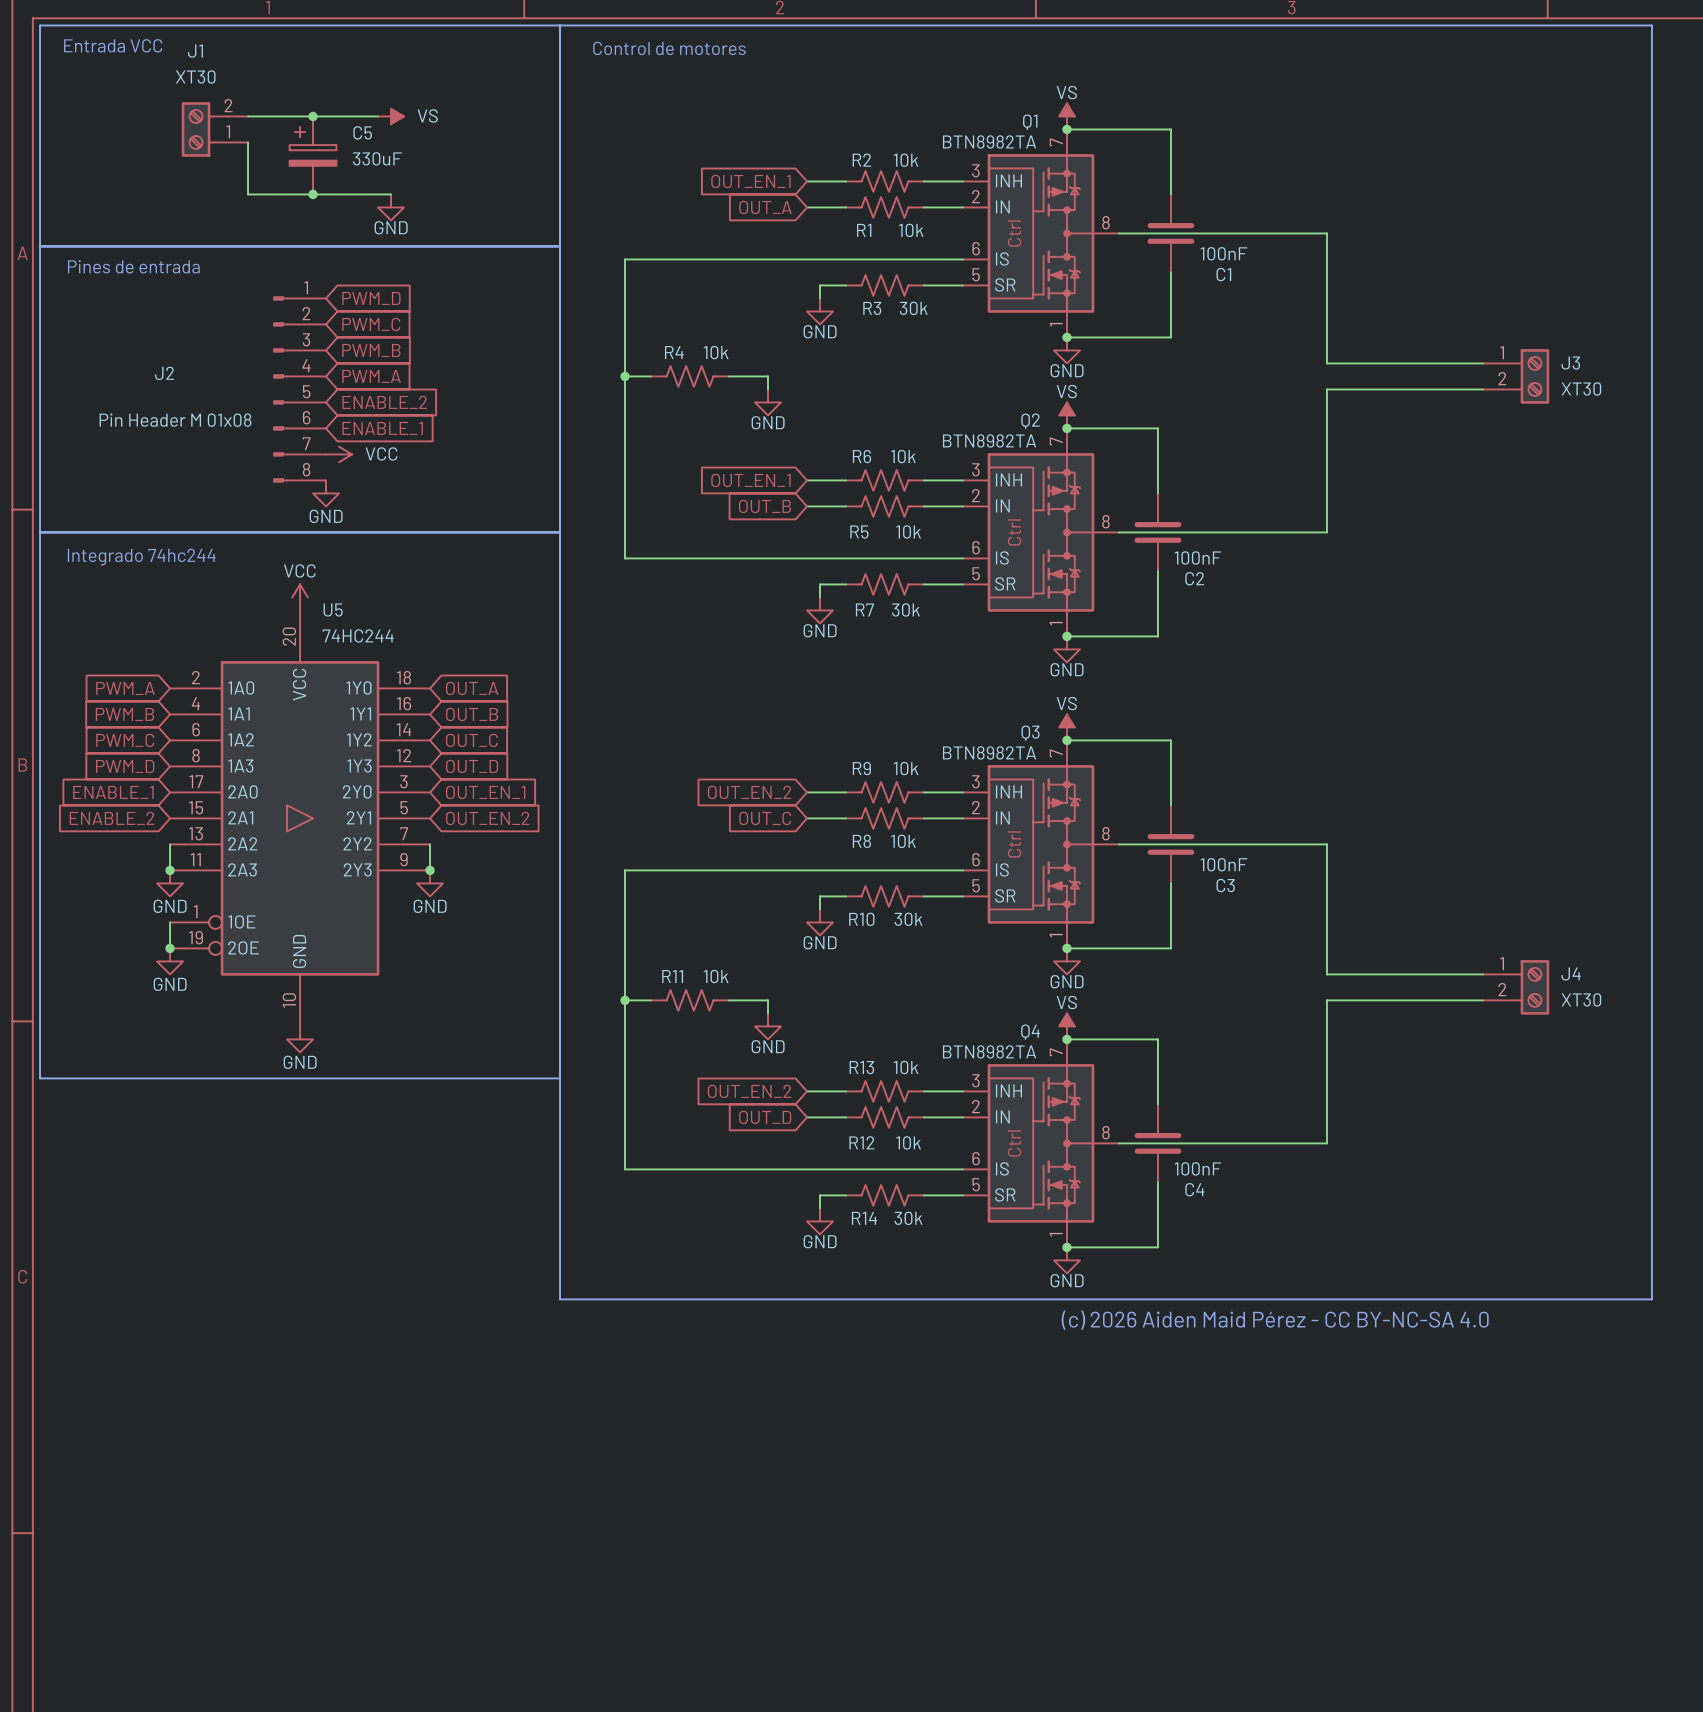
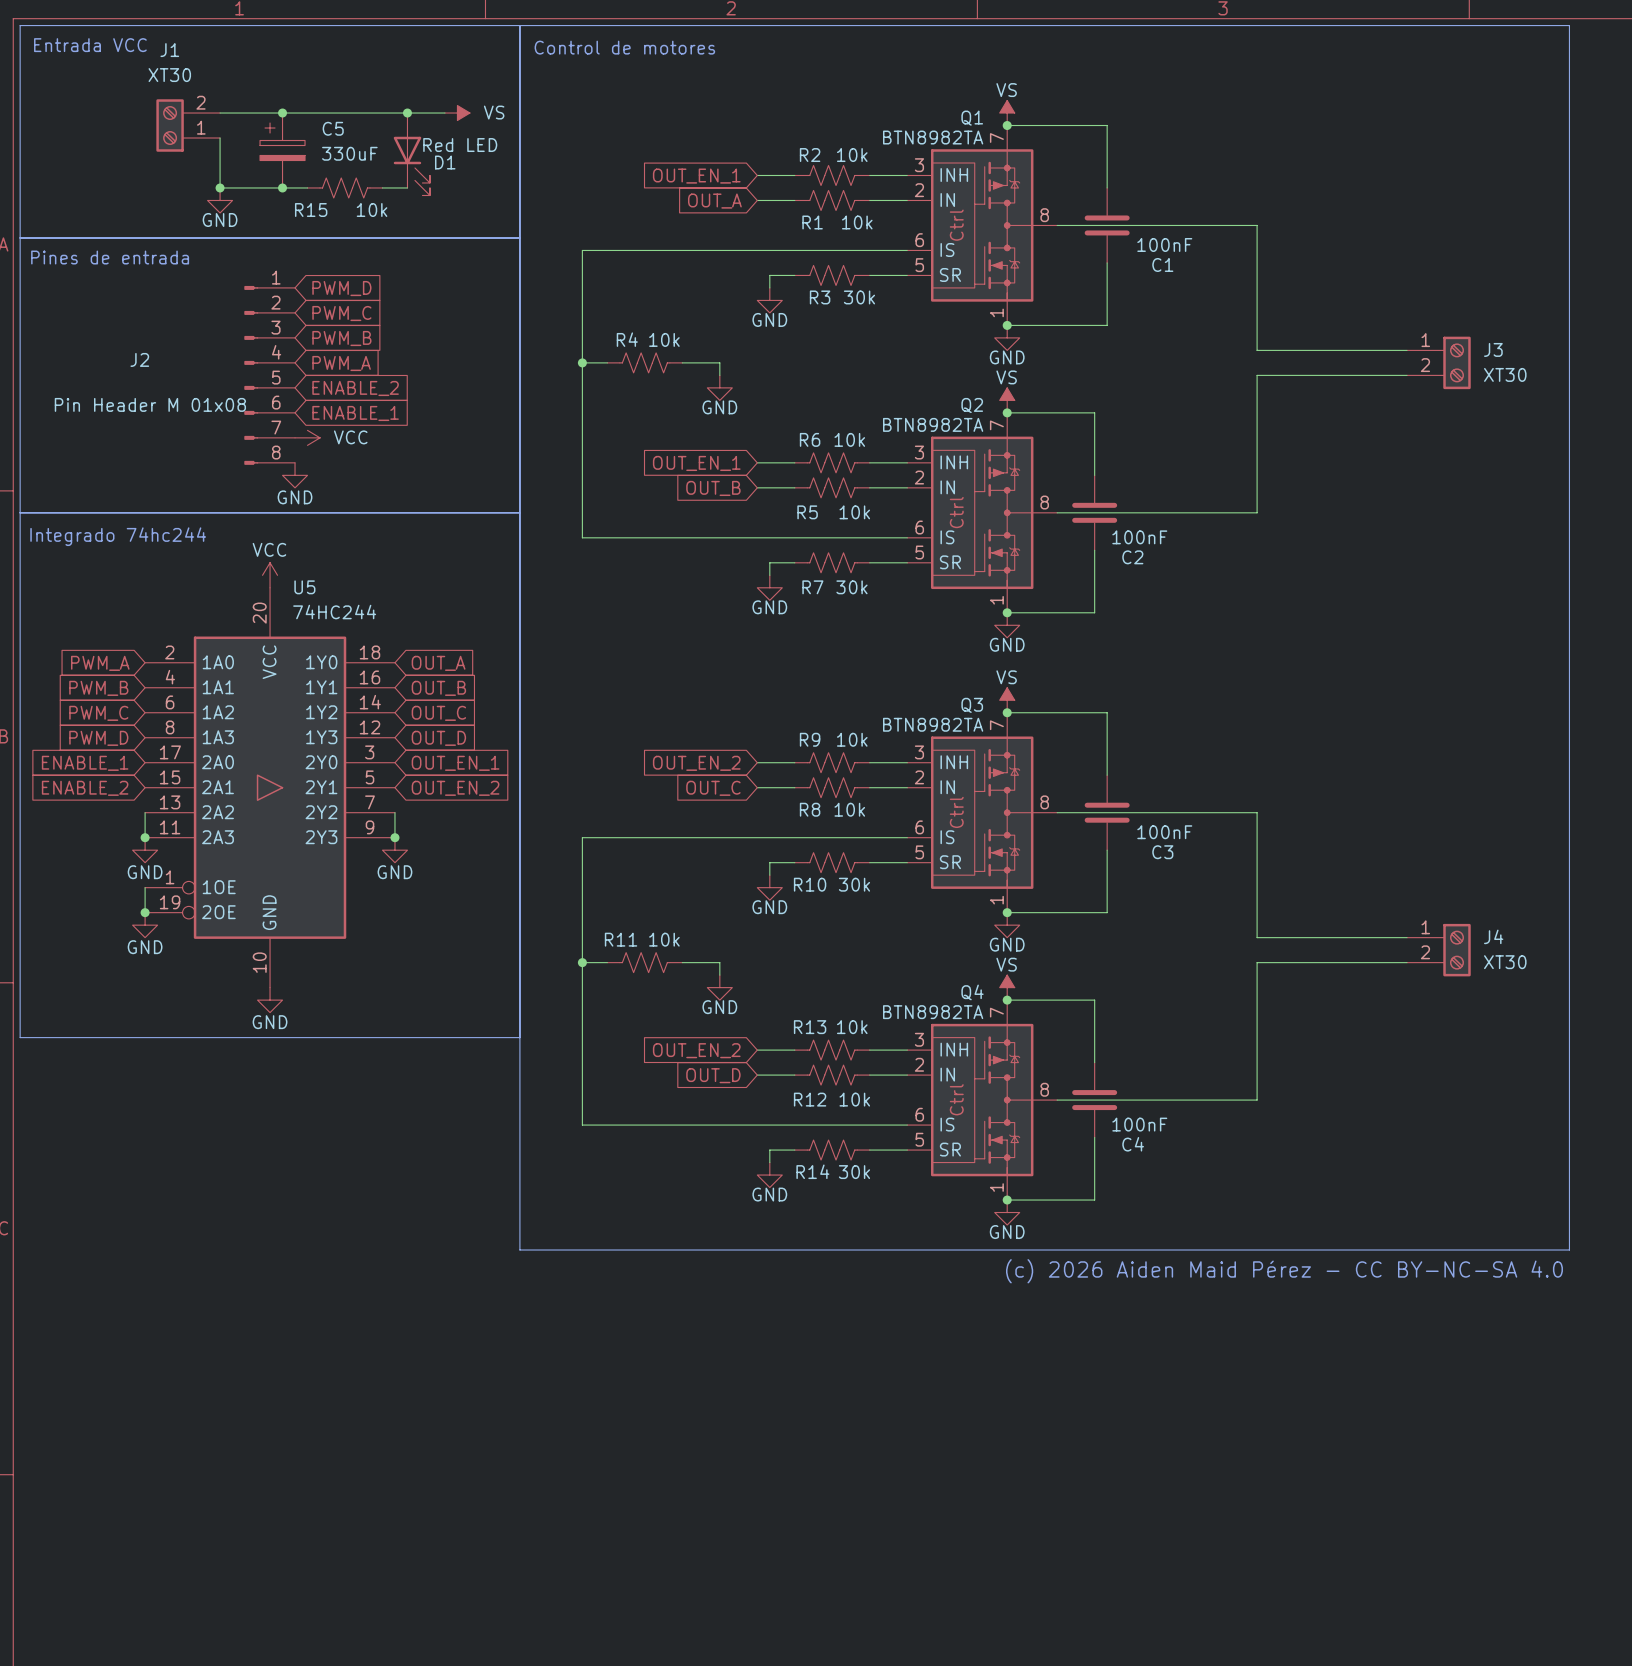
wire: none -> (345, 113) (444, 113)
power symbol position: VS (391, 116) -> VS (457, 113)
junction: none -> (407, 113)
D1: none -> Red LED (411, 154)
junction: none -> (220, 187)
wire: (339, 194) (391, 194) -> none
R15: none -> 10k (345, 187)
wire: none -> (382, 187) (407, 187)
power symbol position: GND (391, 207) -> GND (220, 200)

